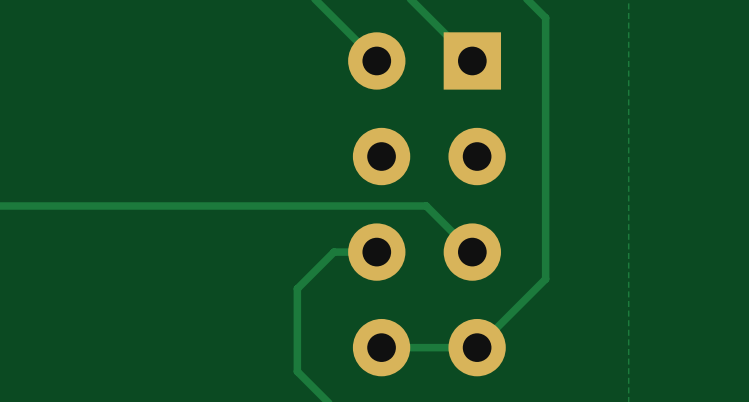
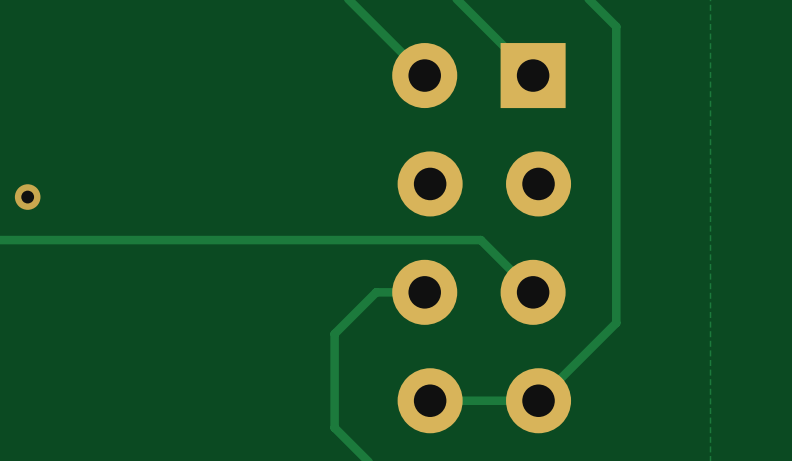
via: none -> (27, 197)

